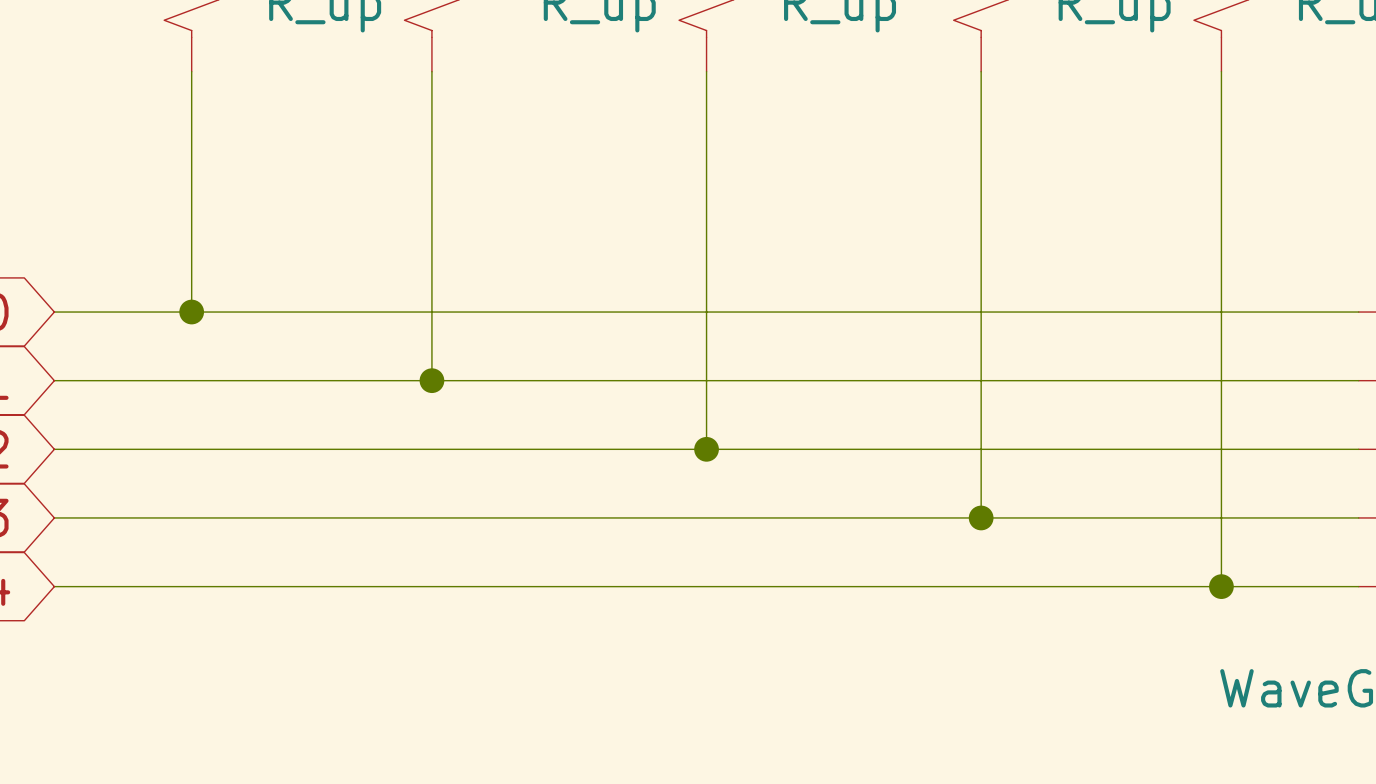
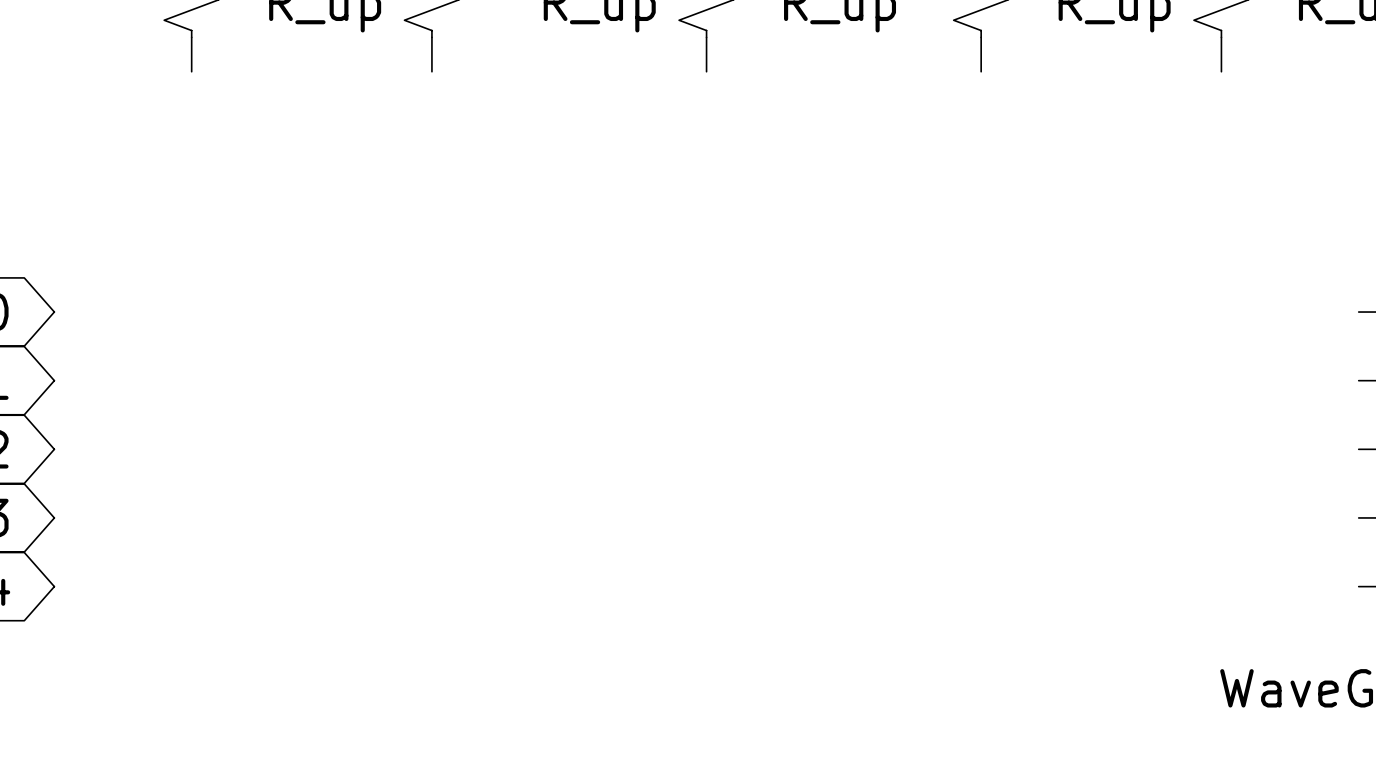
wire: (191, 71) (191, 312) -> none
wire: (431, 71) (431, 380) -> none
wire: (706, 71) (706, 449) -> none
wire: (981, 71) (981, 517) -> none
wire: (1221, 71) (1221, 586) -> none
wire: (54, 312) (1358, 312) -> none
junction: (191, 312) -> none
wire: (54, 380) (1358, 380) -> none
junction: (431, 380) -> none
wire: (54, 449) (1358, 449) -> none
junction: (706, 449) -> none
wire: (54, 517) (1358, 517) -> none
junction: (981, 517) -> none
wire: (54, 586) (1358, 586) -> none
junction: (1221, 586) -> none

